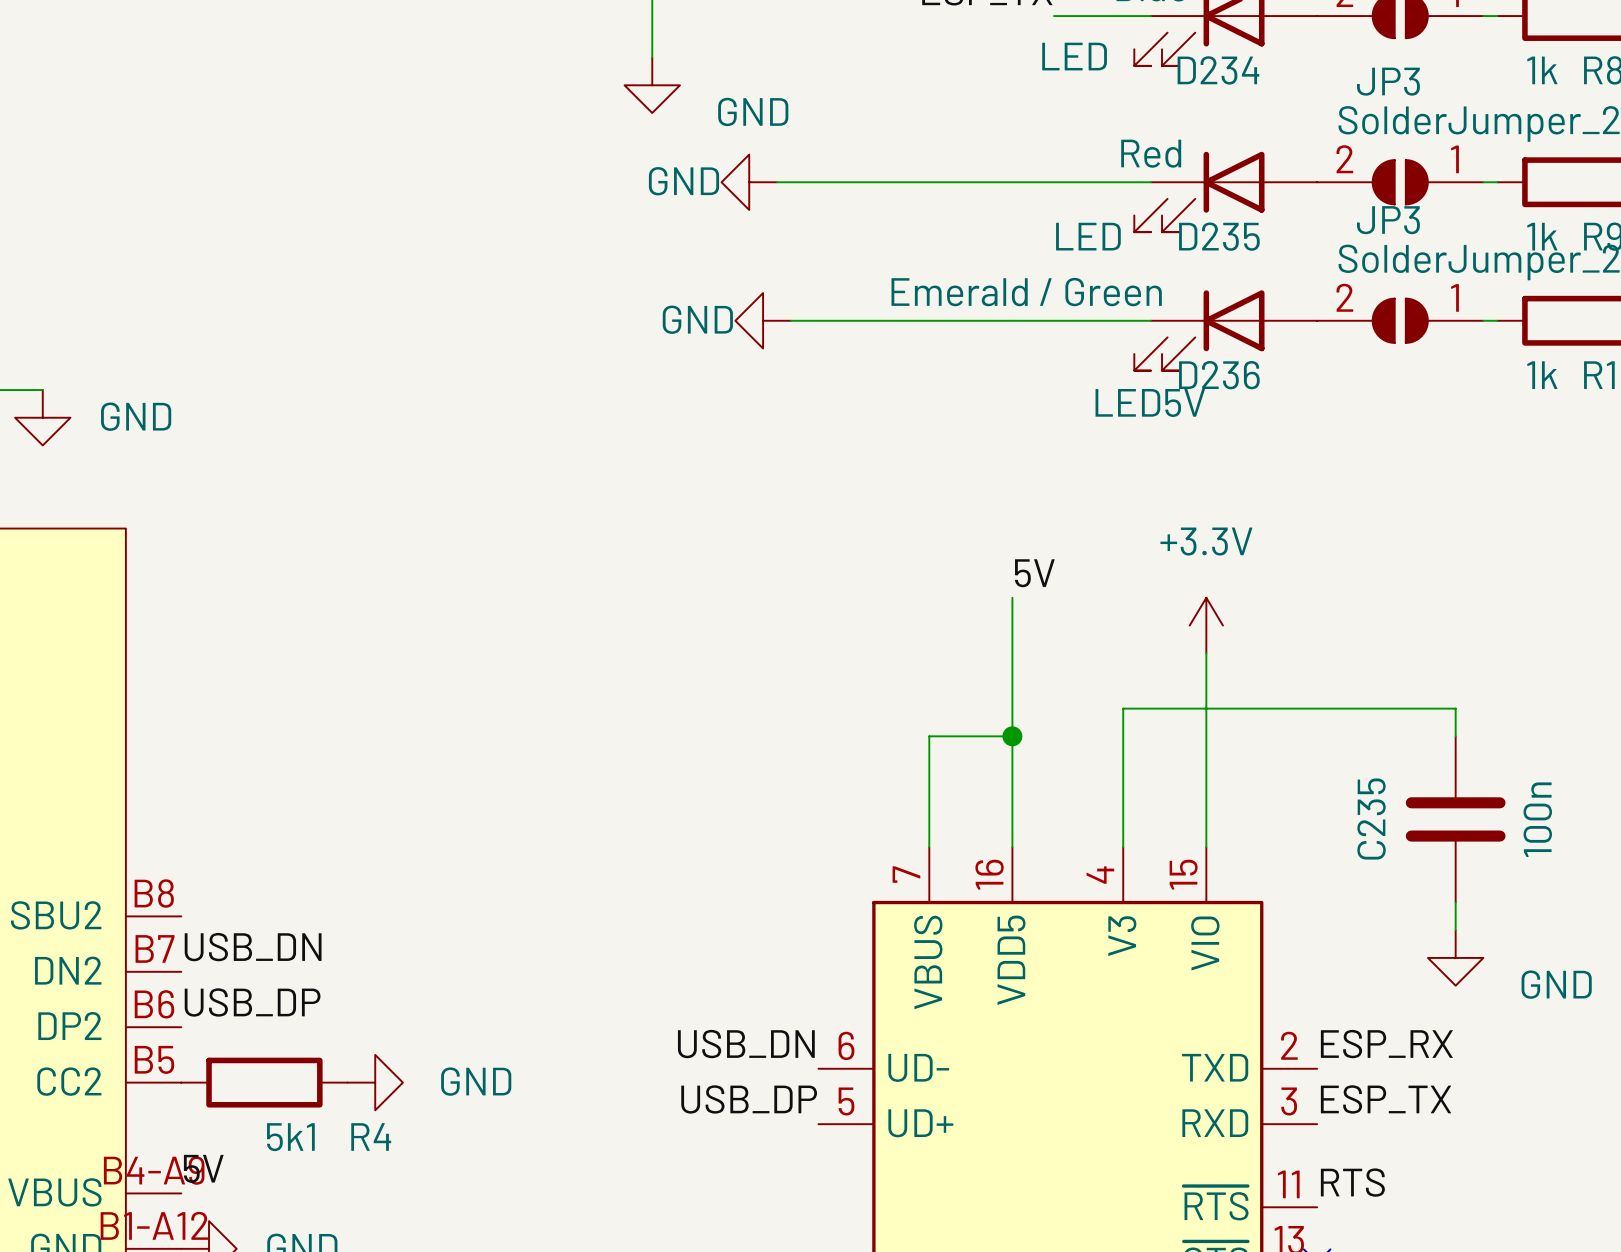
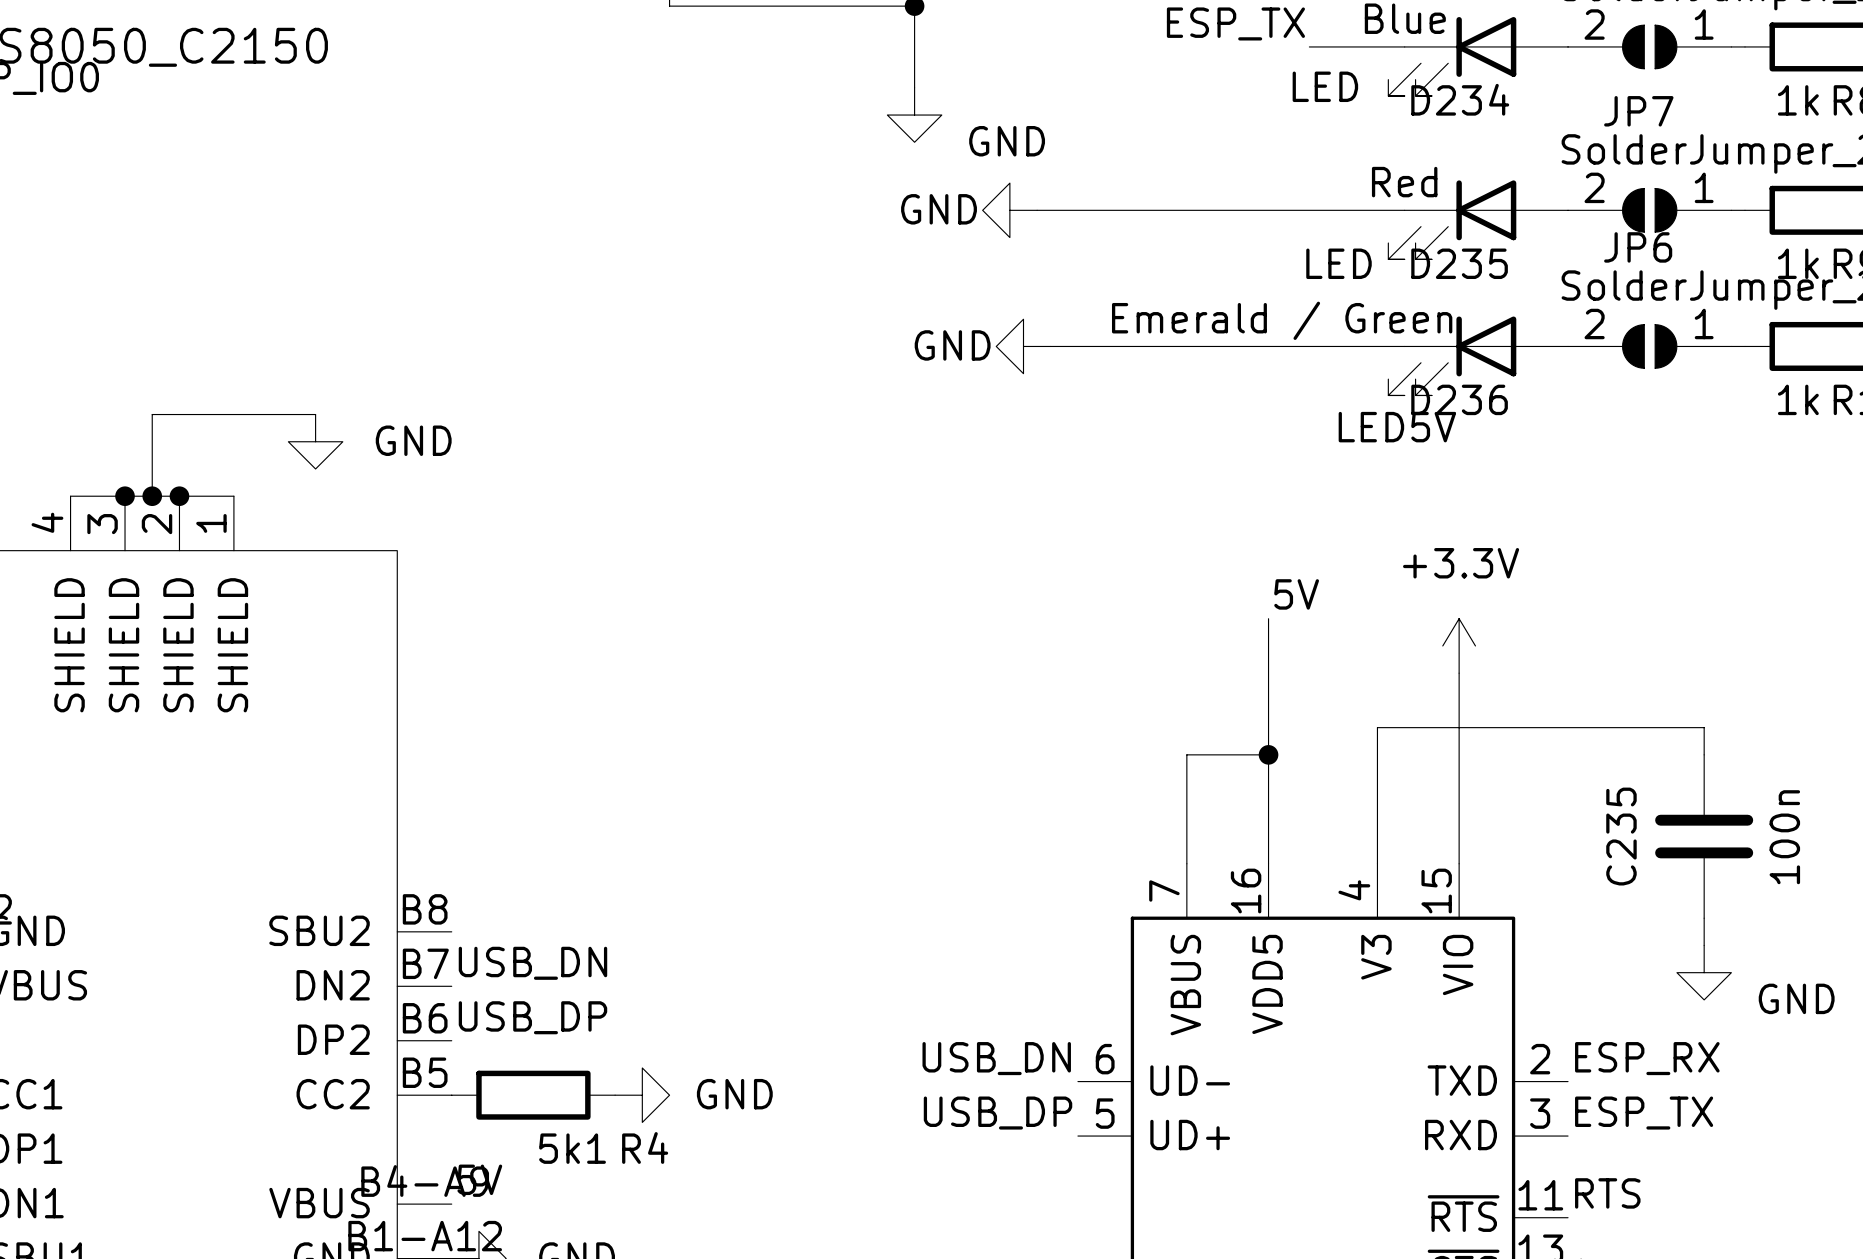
JP3 name: JP3 (1388, 81) -> JP7 (1638, 111)
JP3 name: JP3 (1388, 220) -> JP6 (1638, 247)

